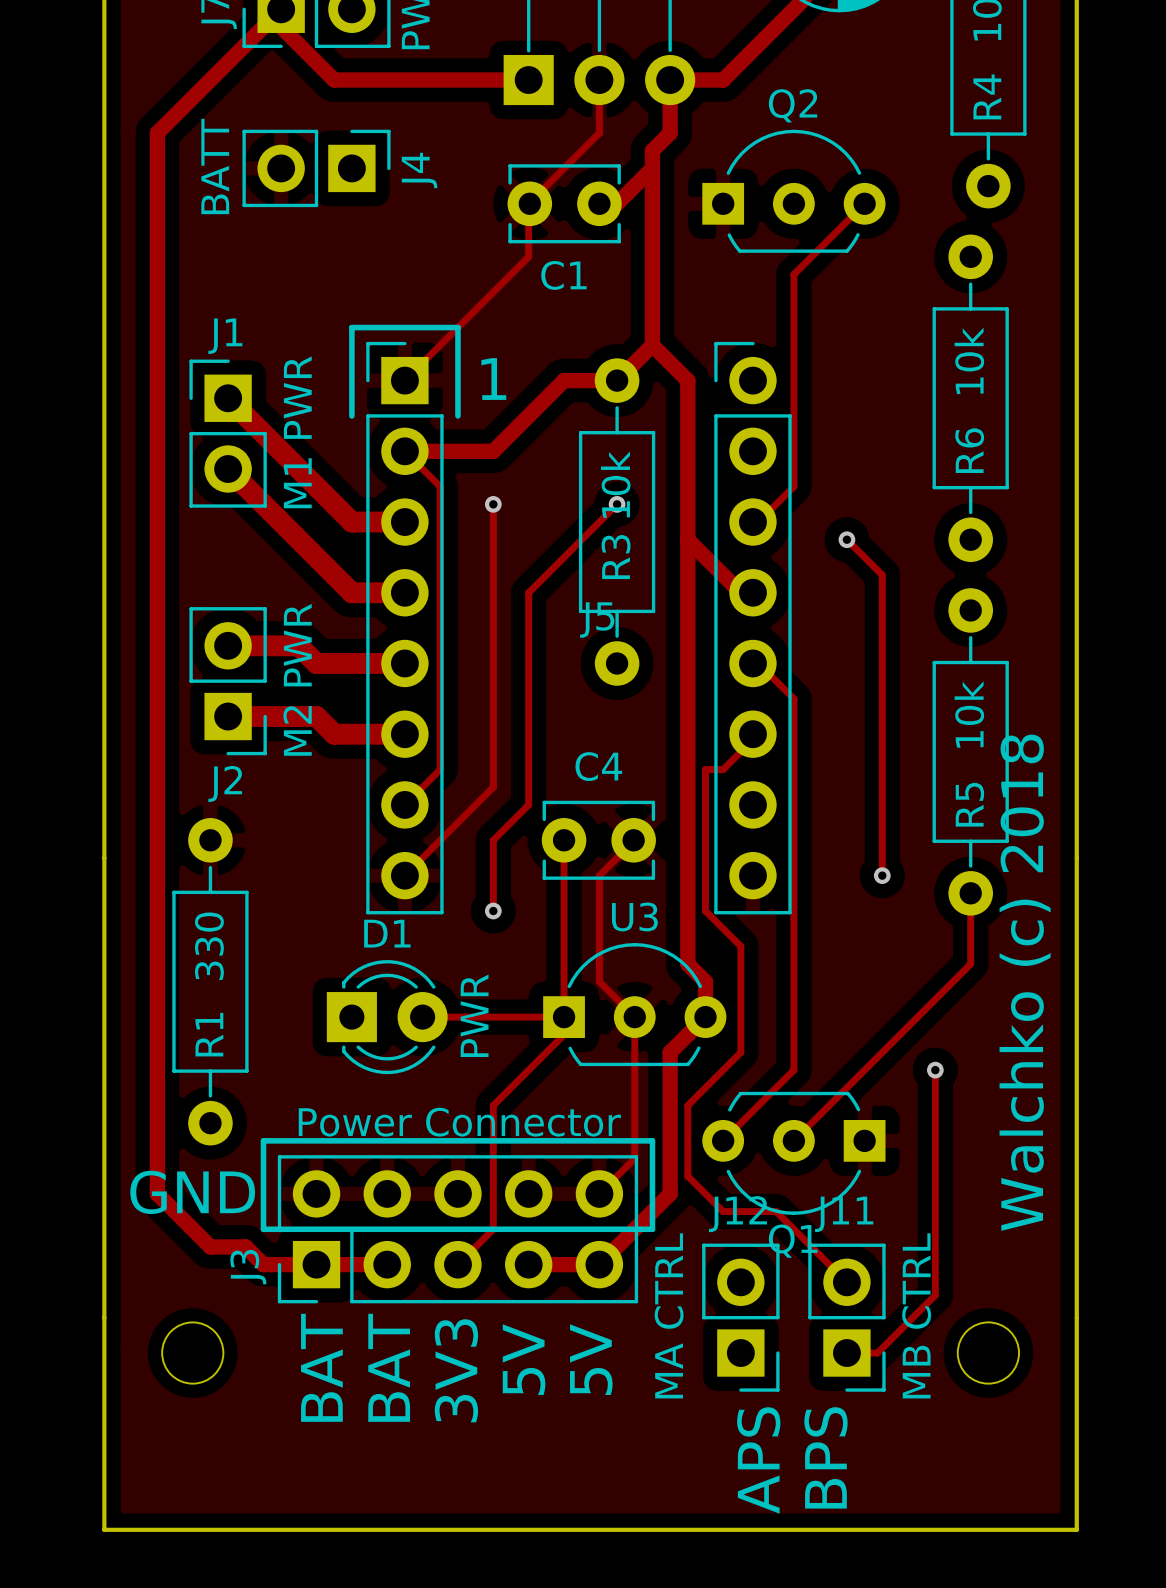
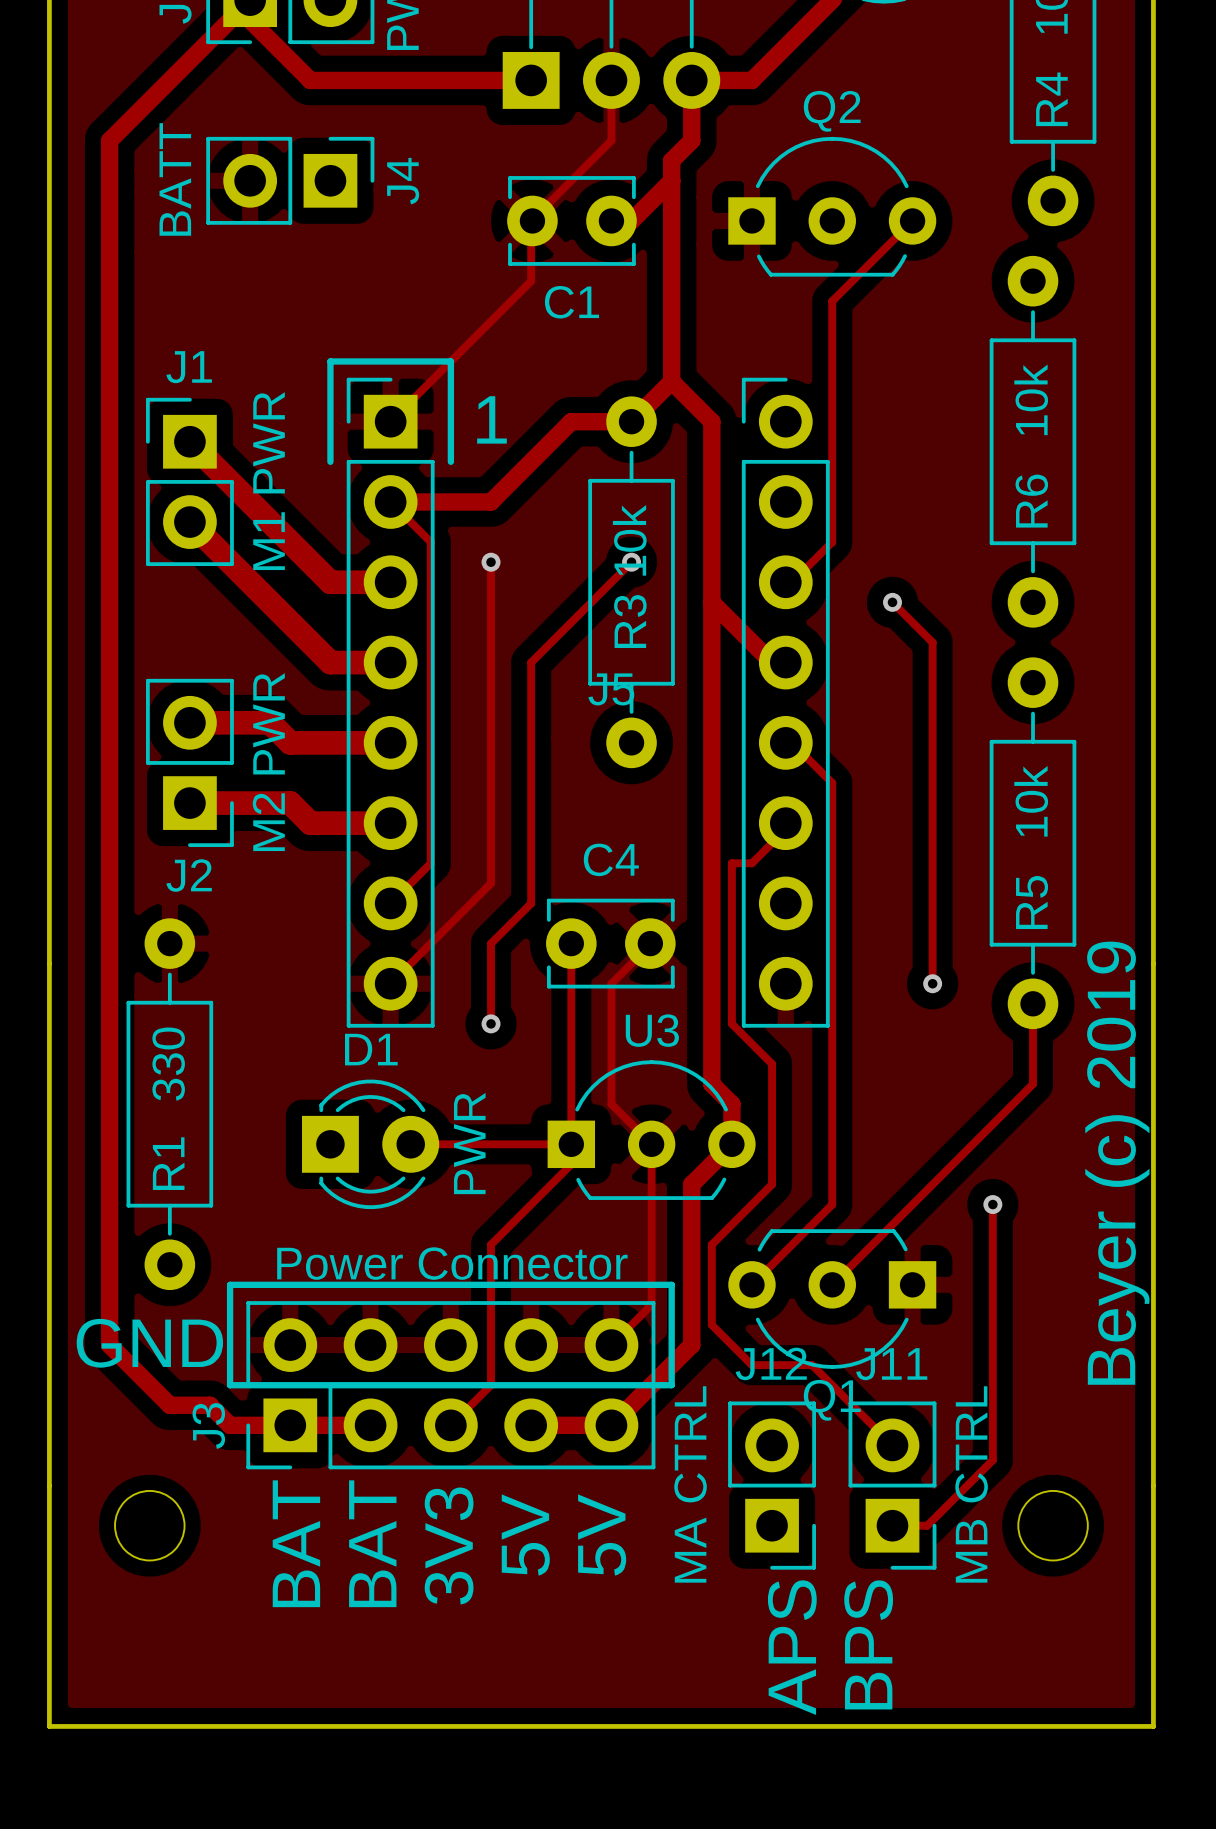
text: Walchko (c) 2018 (1025, 982) -> none
text: none -> Beyer (c) 2019 (1117, 1163)

